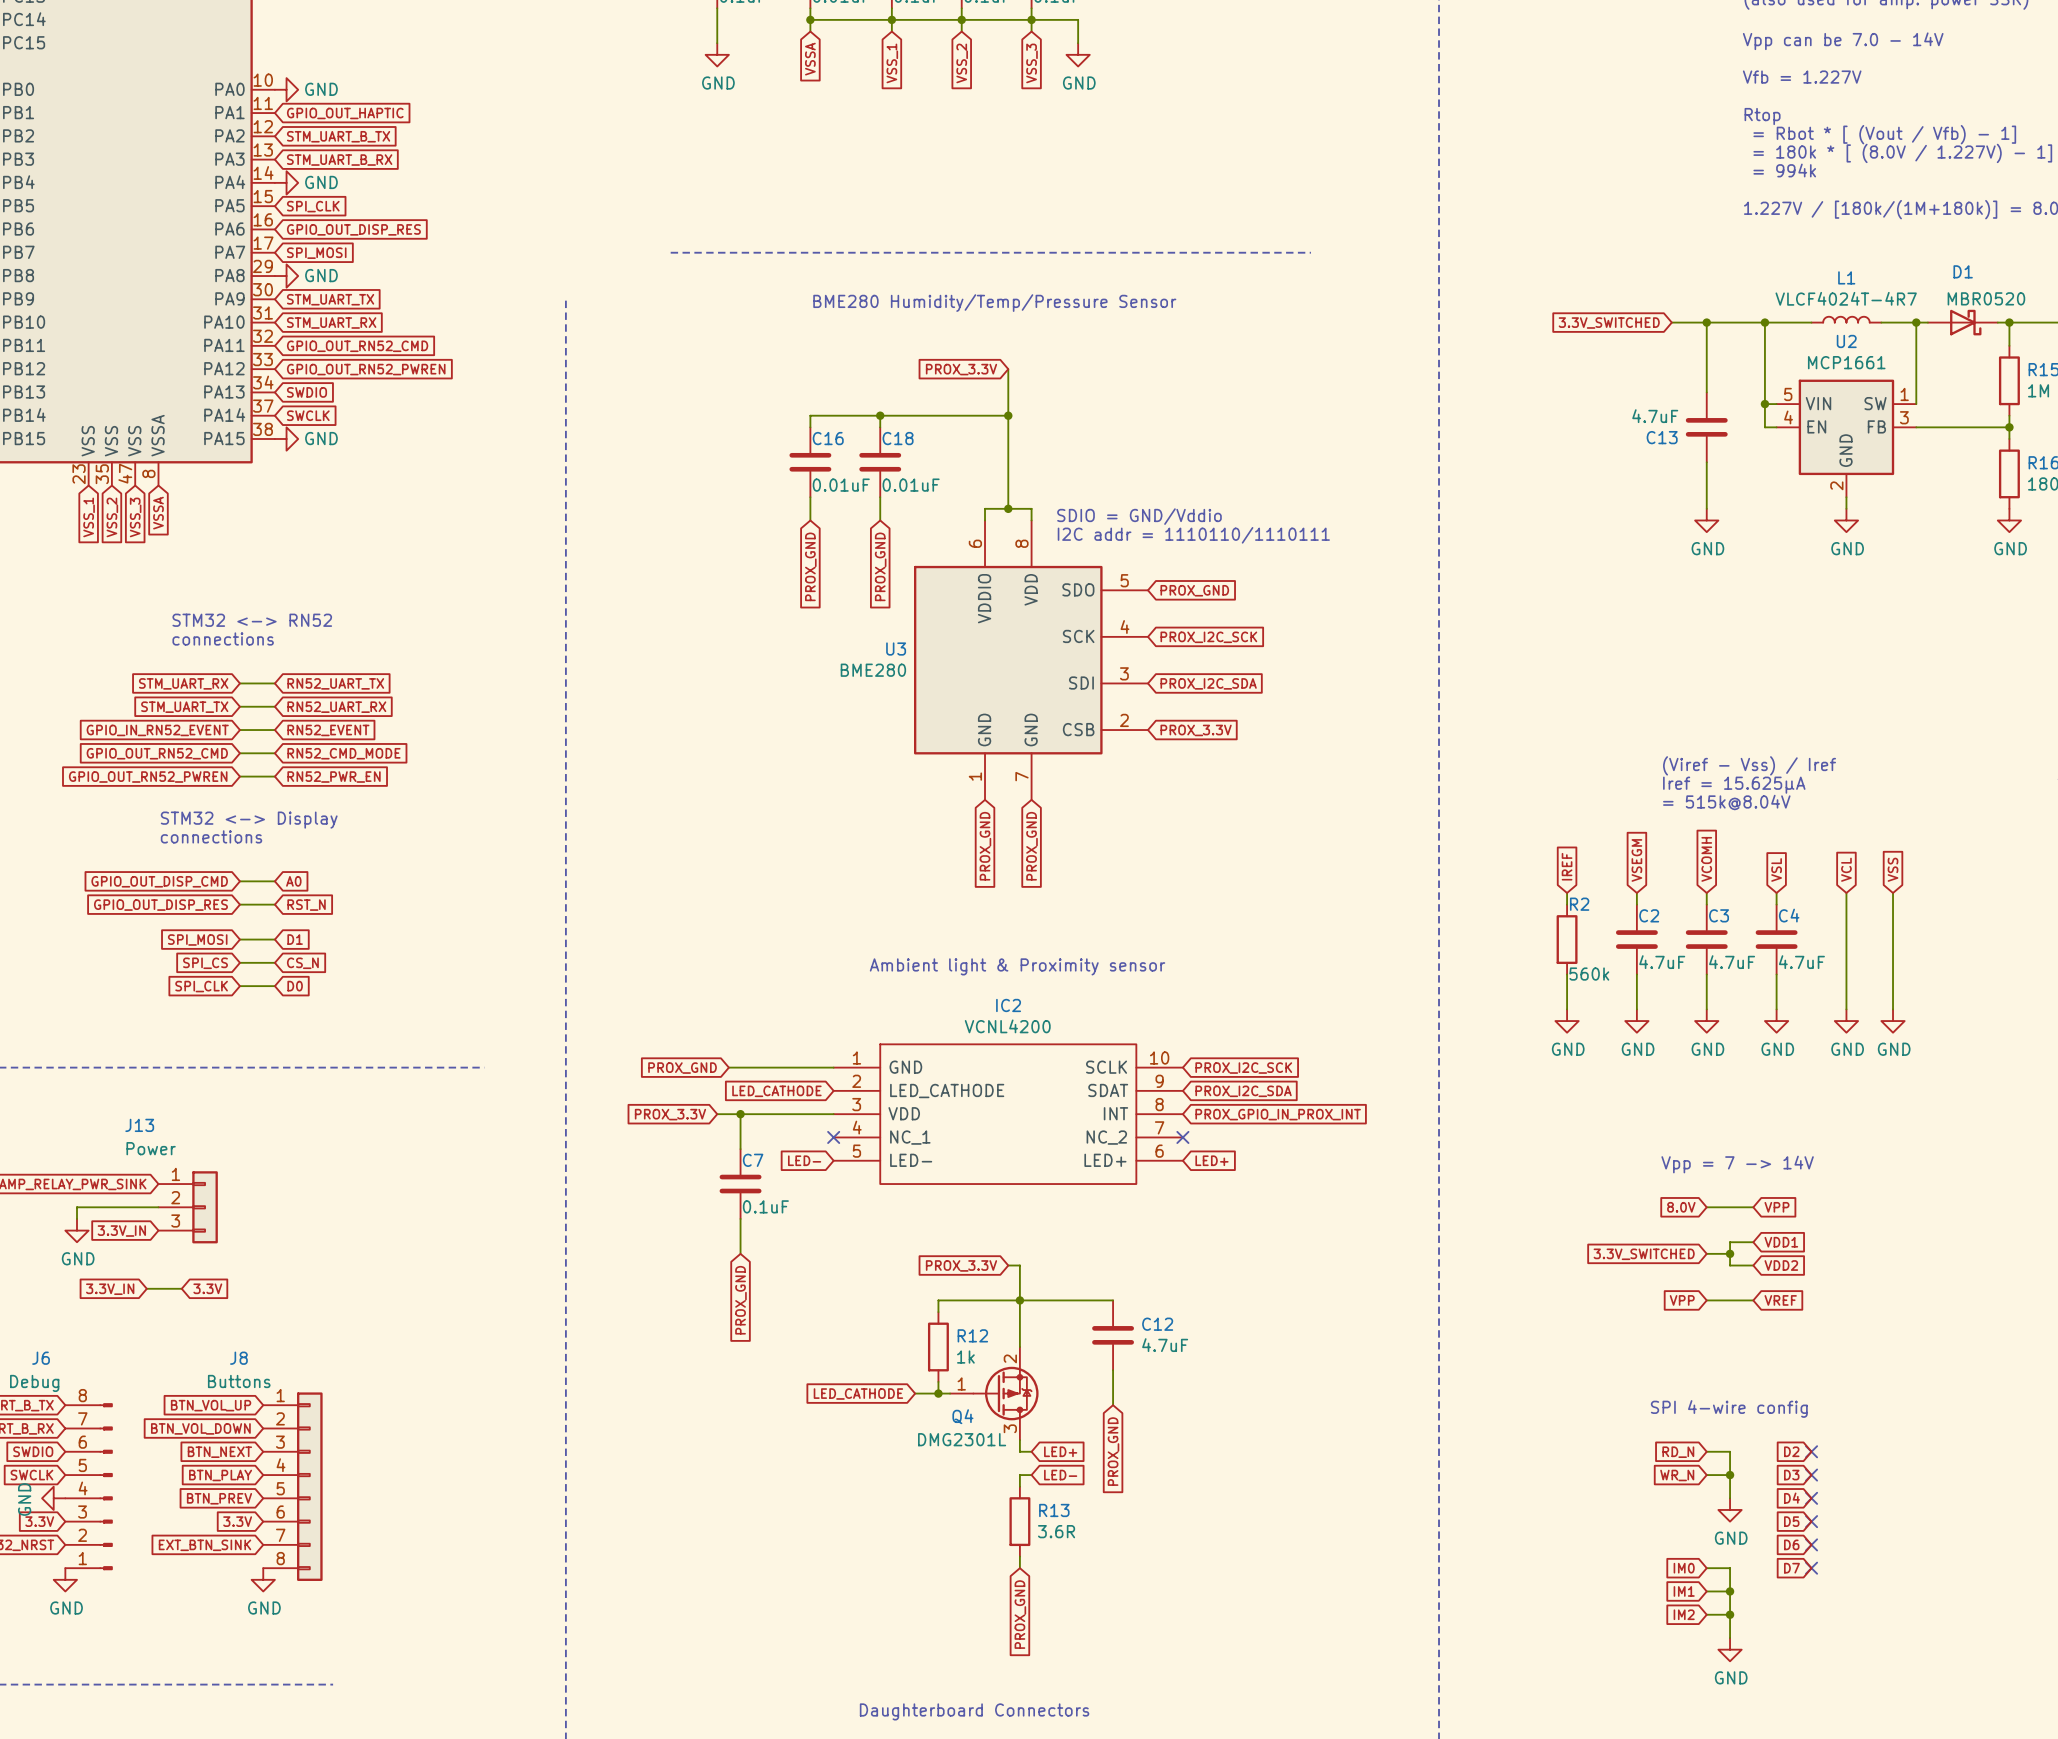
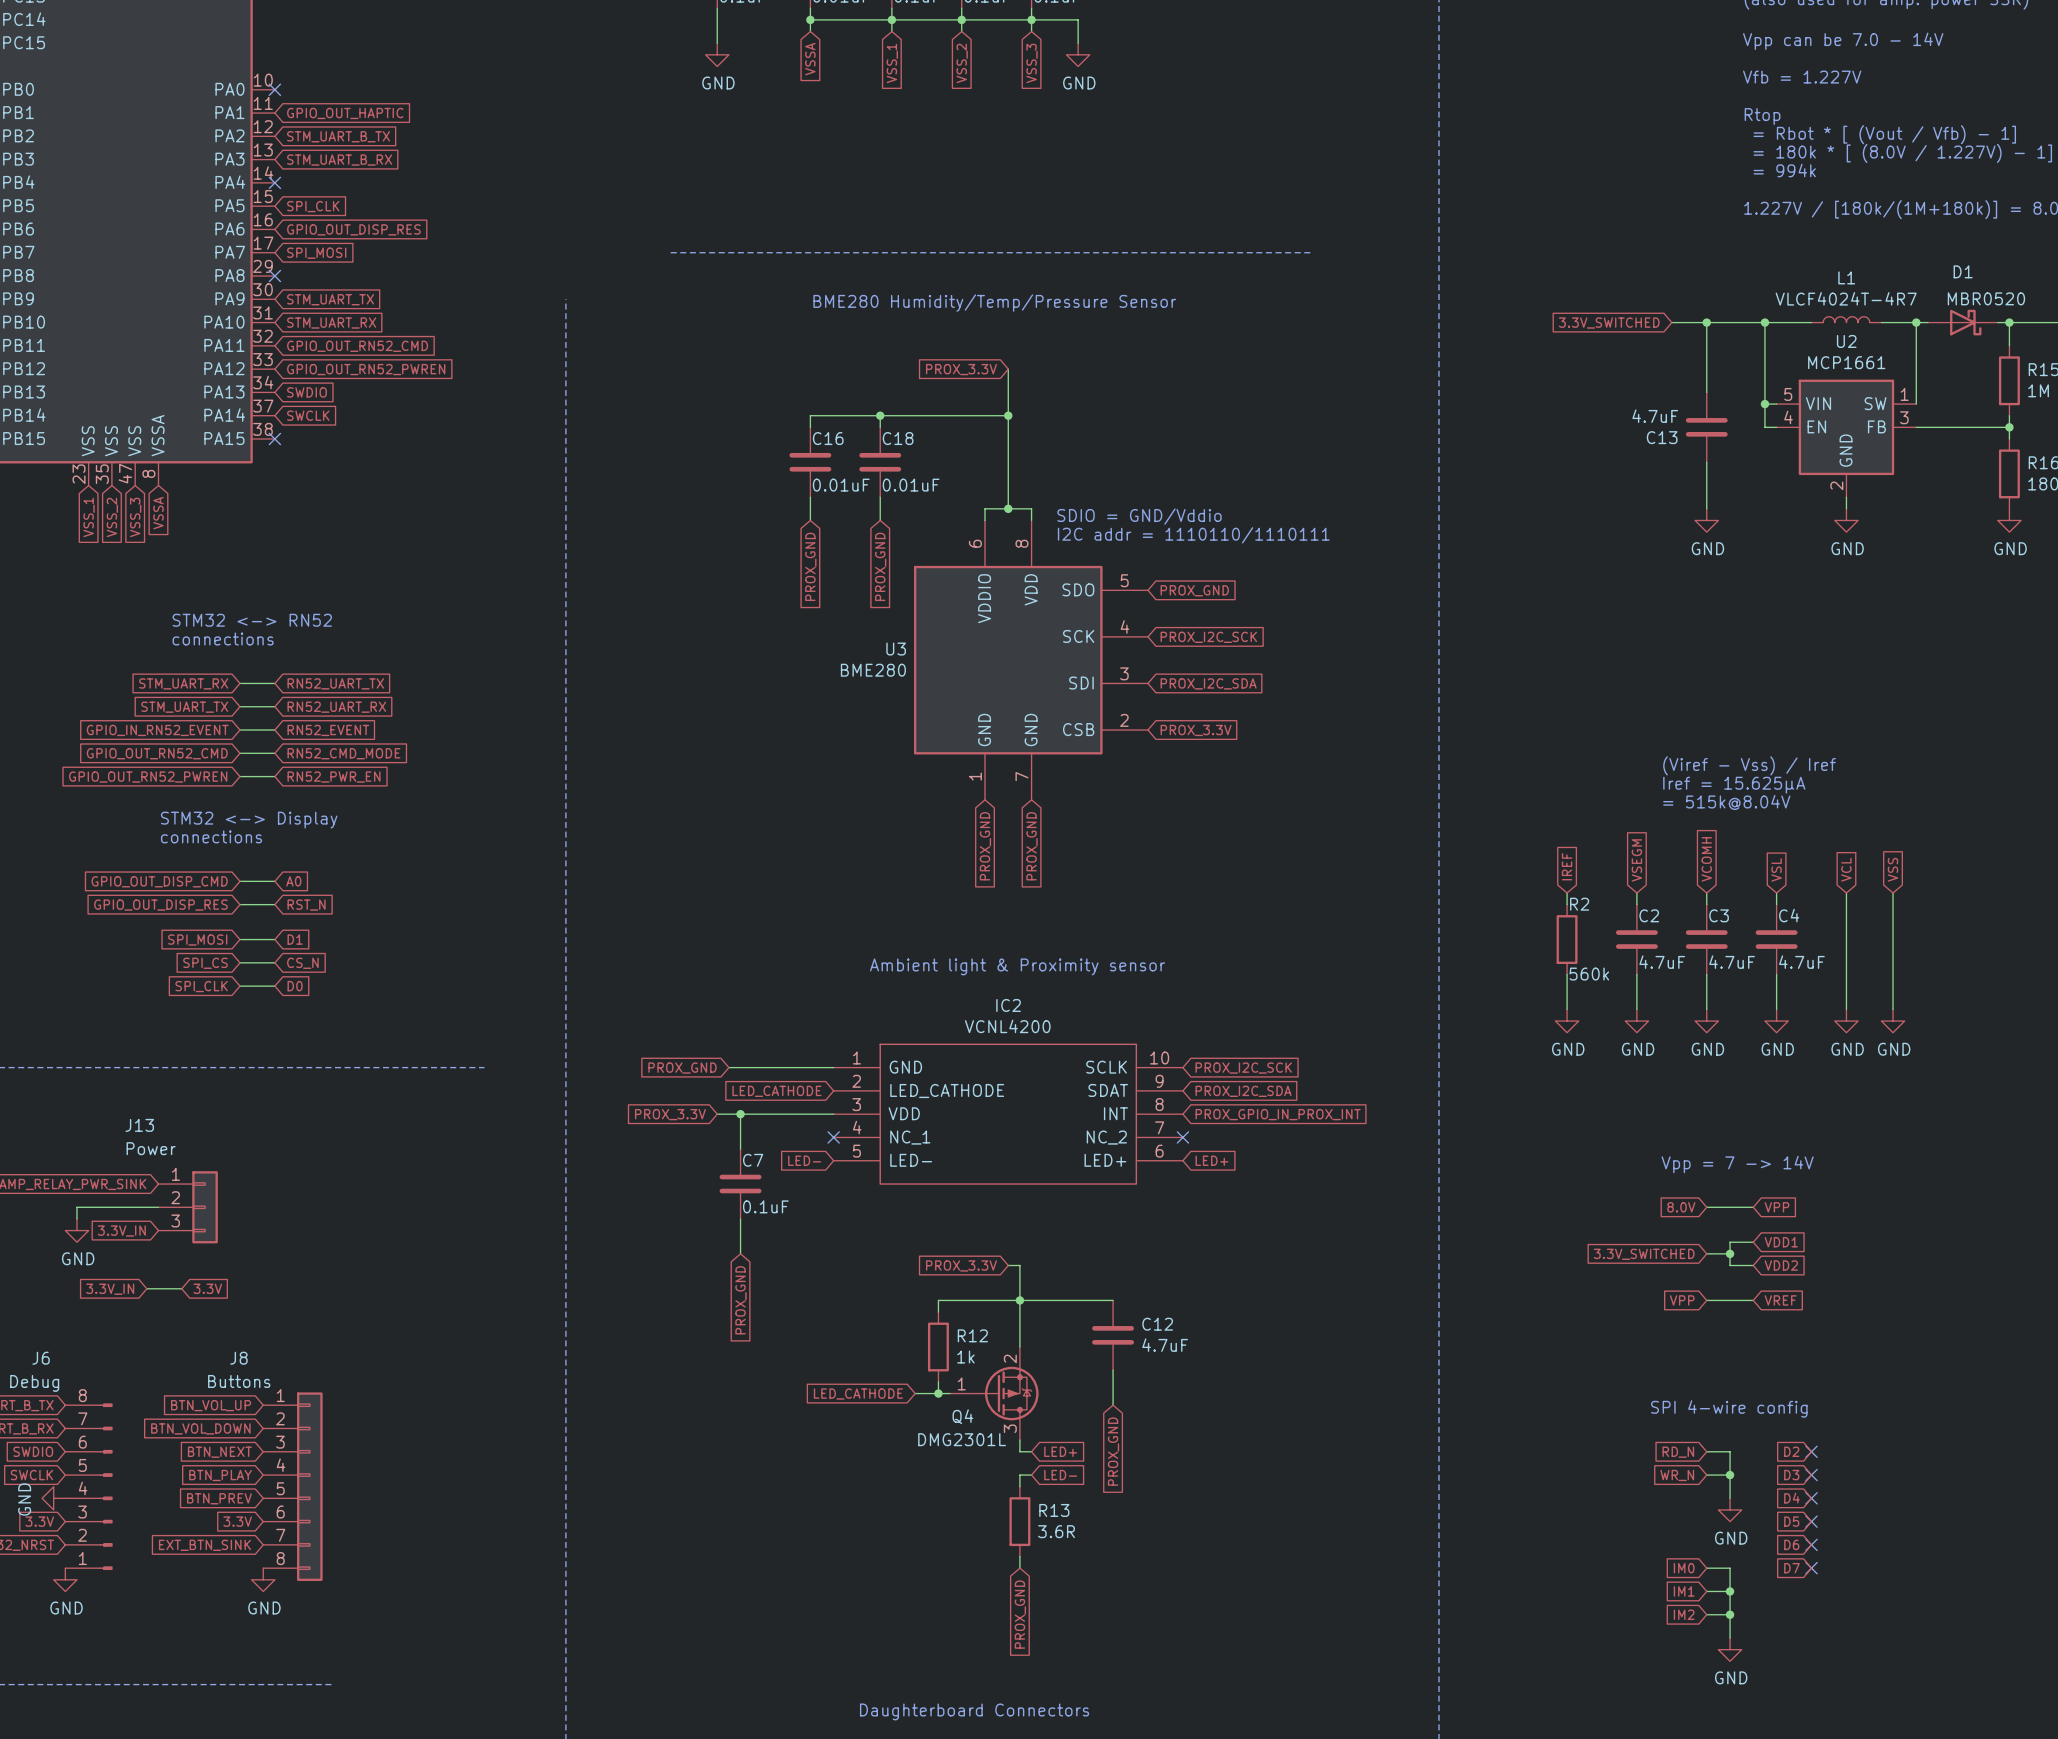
no-connect mark: none -> (274, 89)
power symbol: GND (286, 89) -> none
no-connect mark: none -> (274, 182)
power symbol: GND (286, 182) -> none
no-connect mark: none -> (274, 276)
power symbol: GND (286, 276) -> none
no-connect mark: none -> (274, 438)
power symbol: GND (286, 438) -> none

